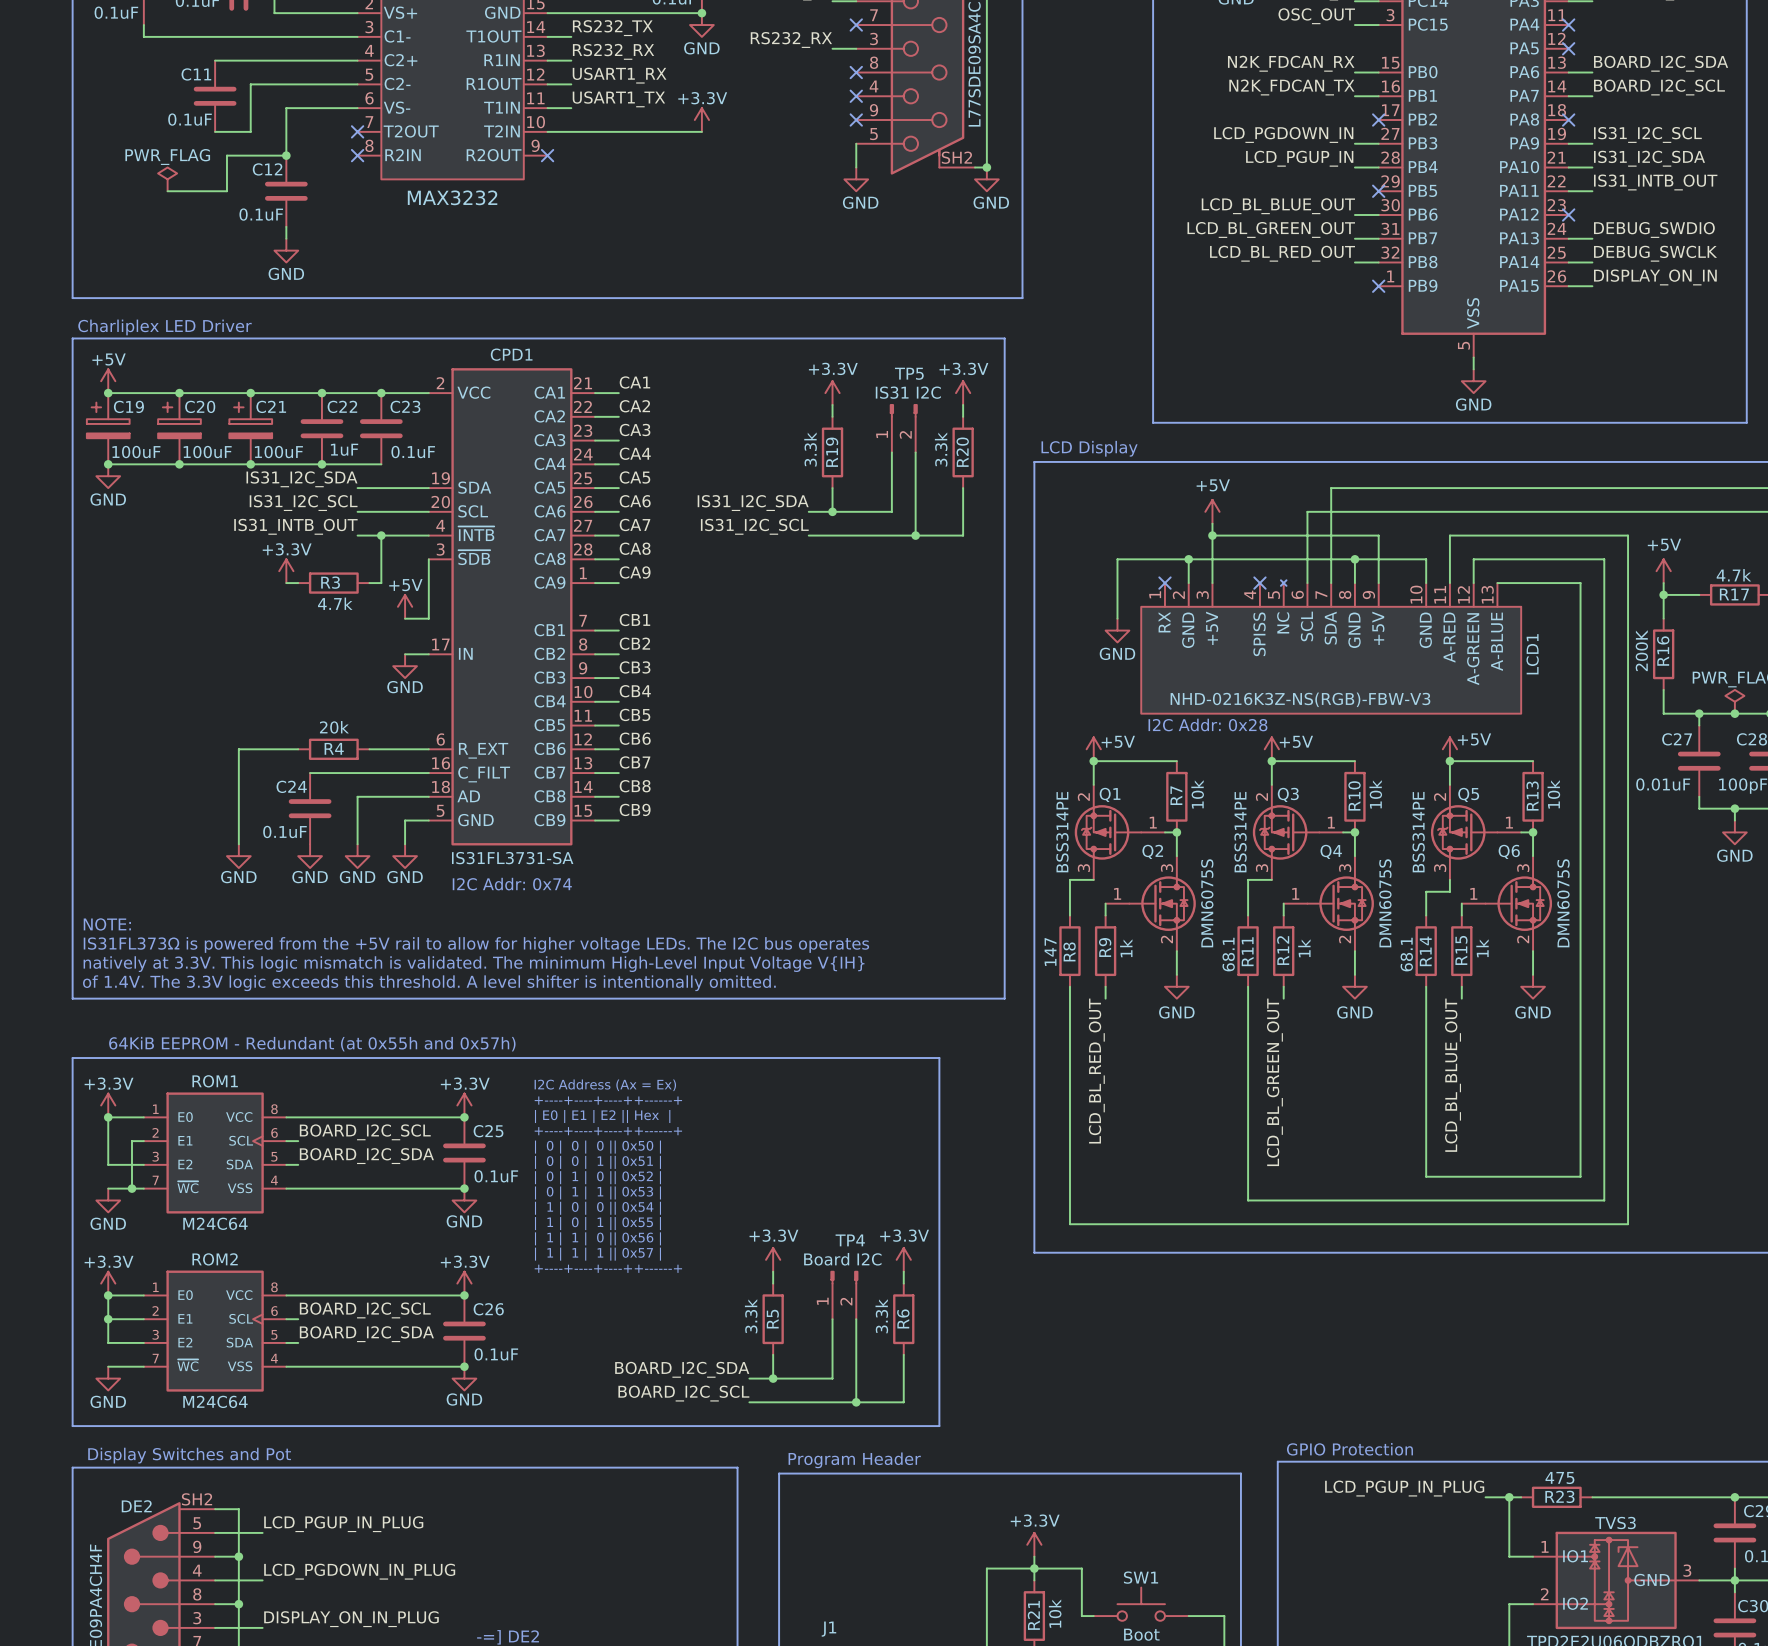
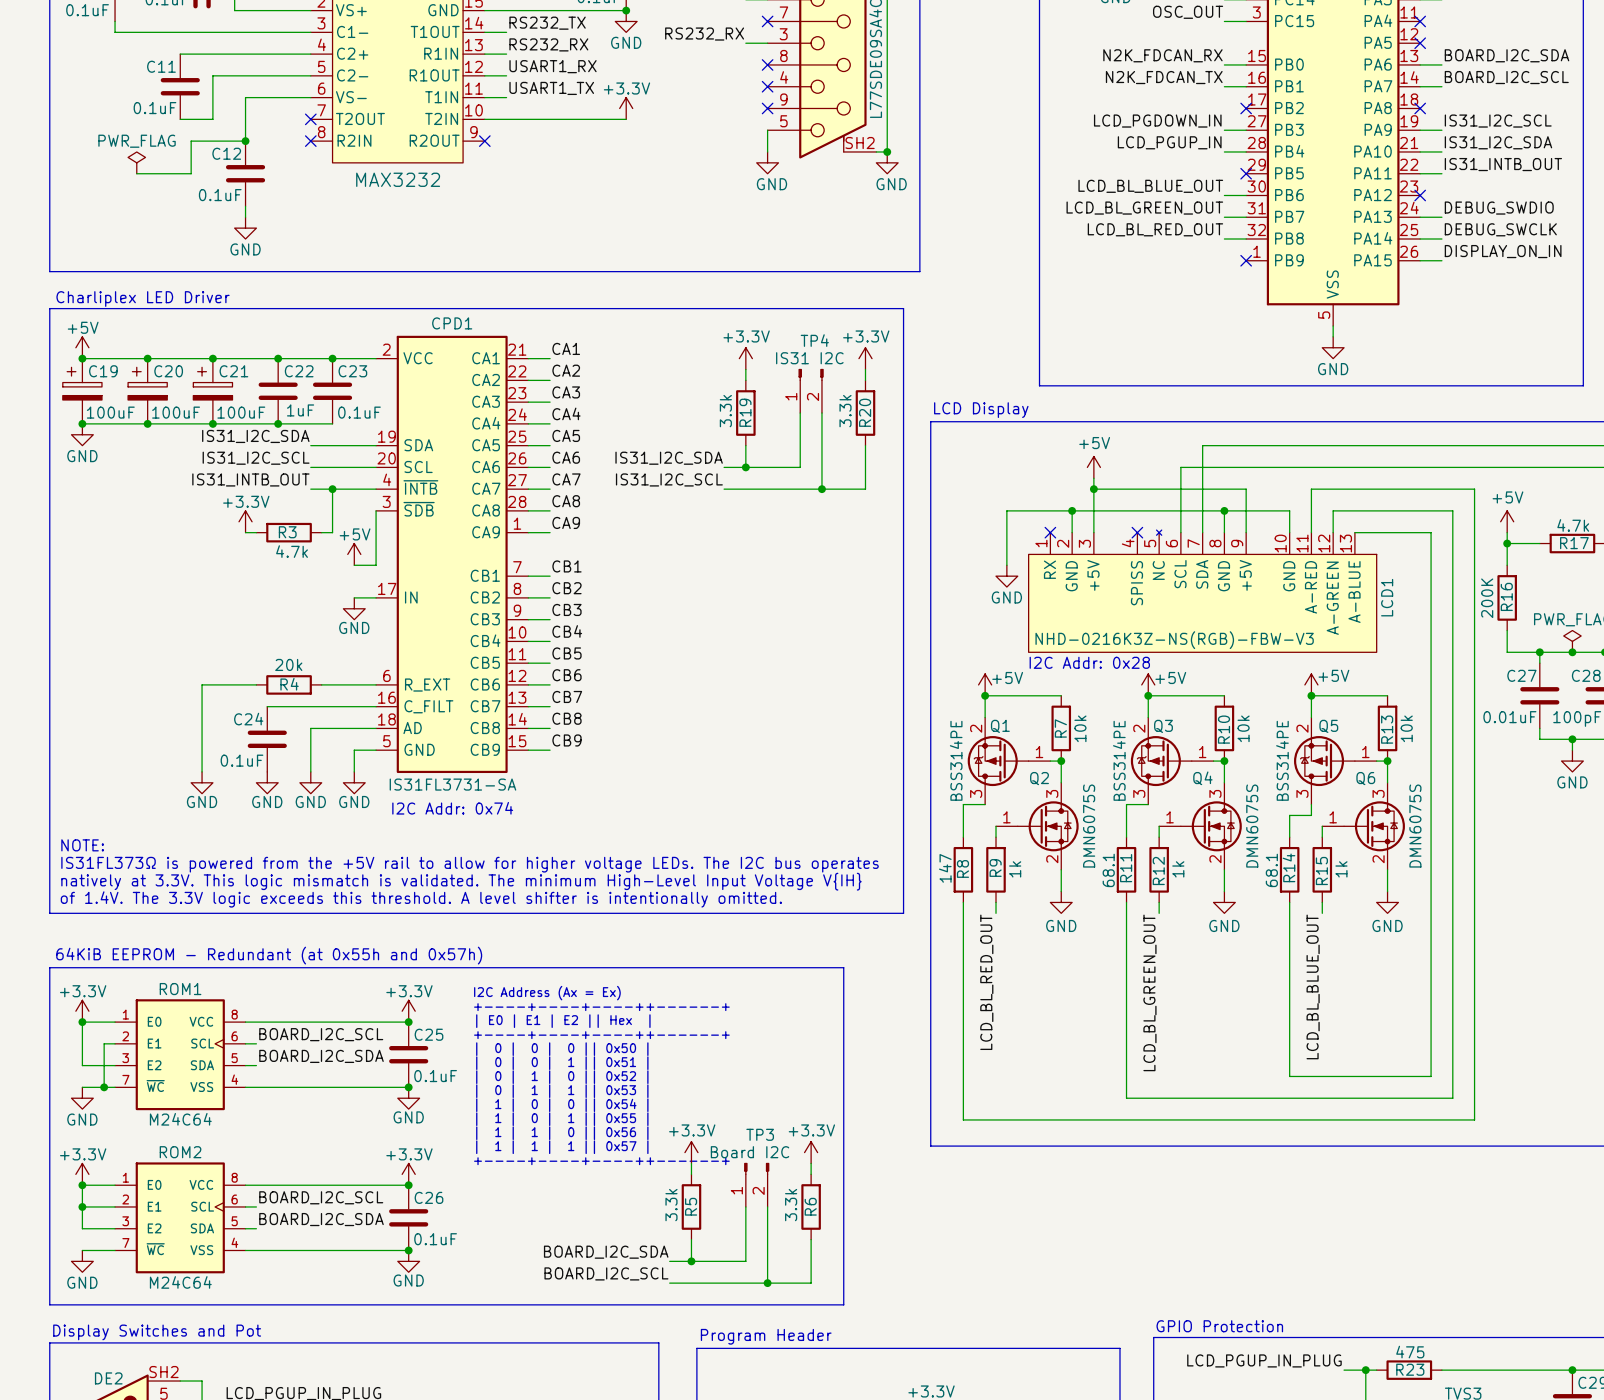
TP5 name: TP5 (909, 373) -> TP4 (814, 340)
TP4 name: TP4 (850, 1240) -> TP3 (760, 1134)

